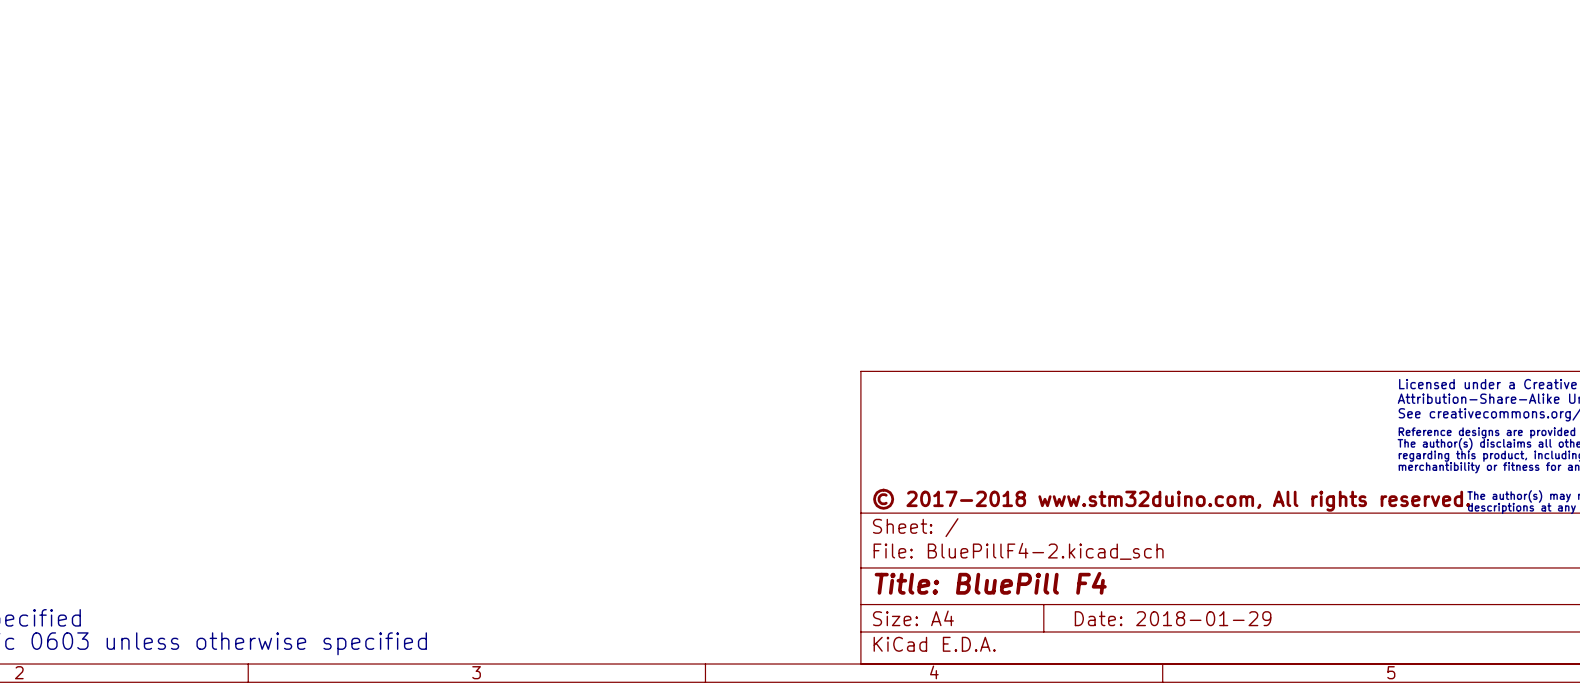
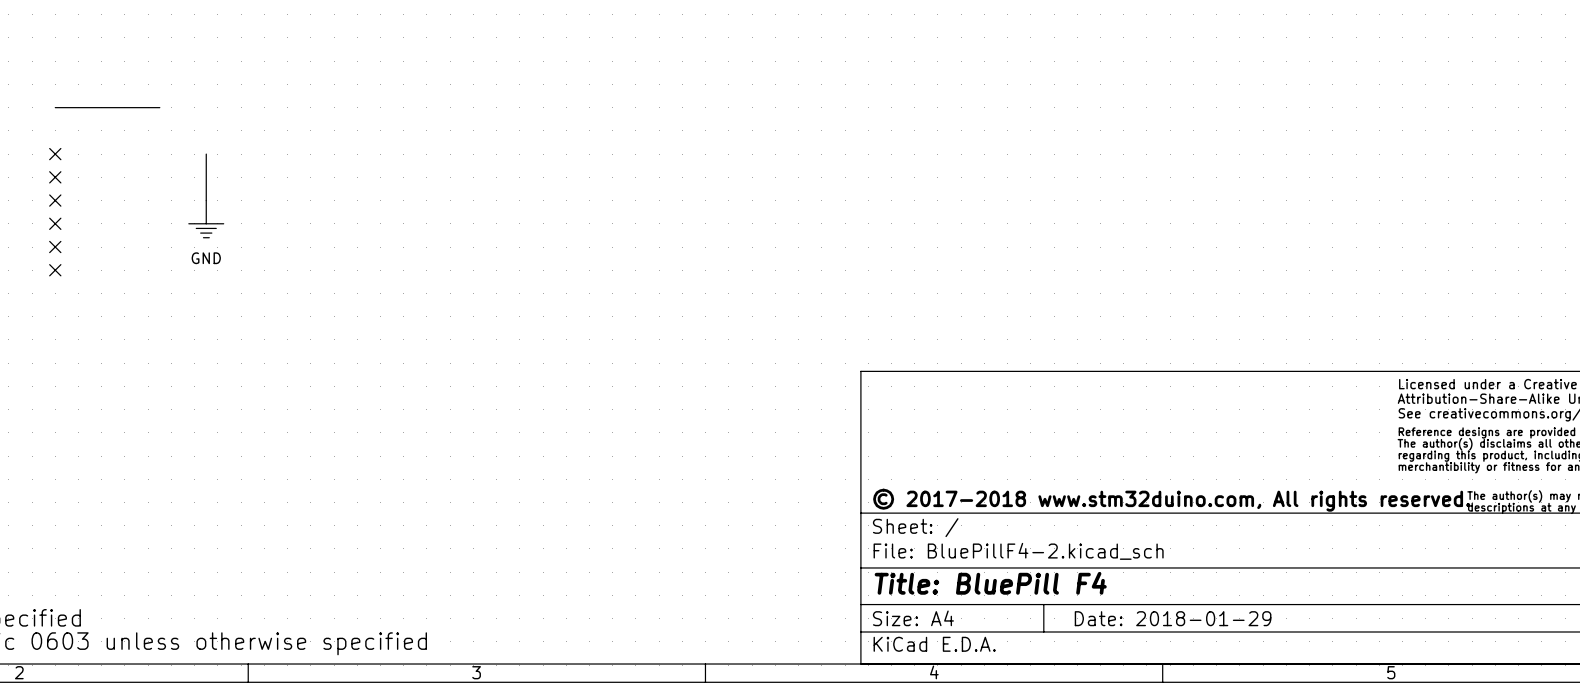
wire: none -> (55, 107) (159, 107)
no-connect mark: none -> (55, 154)
wire: none -> (206, 154) (206, 200)
no-connect mark: none -> (55, 177)
no-connect mark: none -> (55, 200)
power symbol: none -> GND (206, 219)
no-connect mark: none -> (55, 223)
no-connect mark: none -> (55, 247)
no-connect mark: none -> (55, 270)

